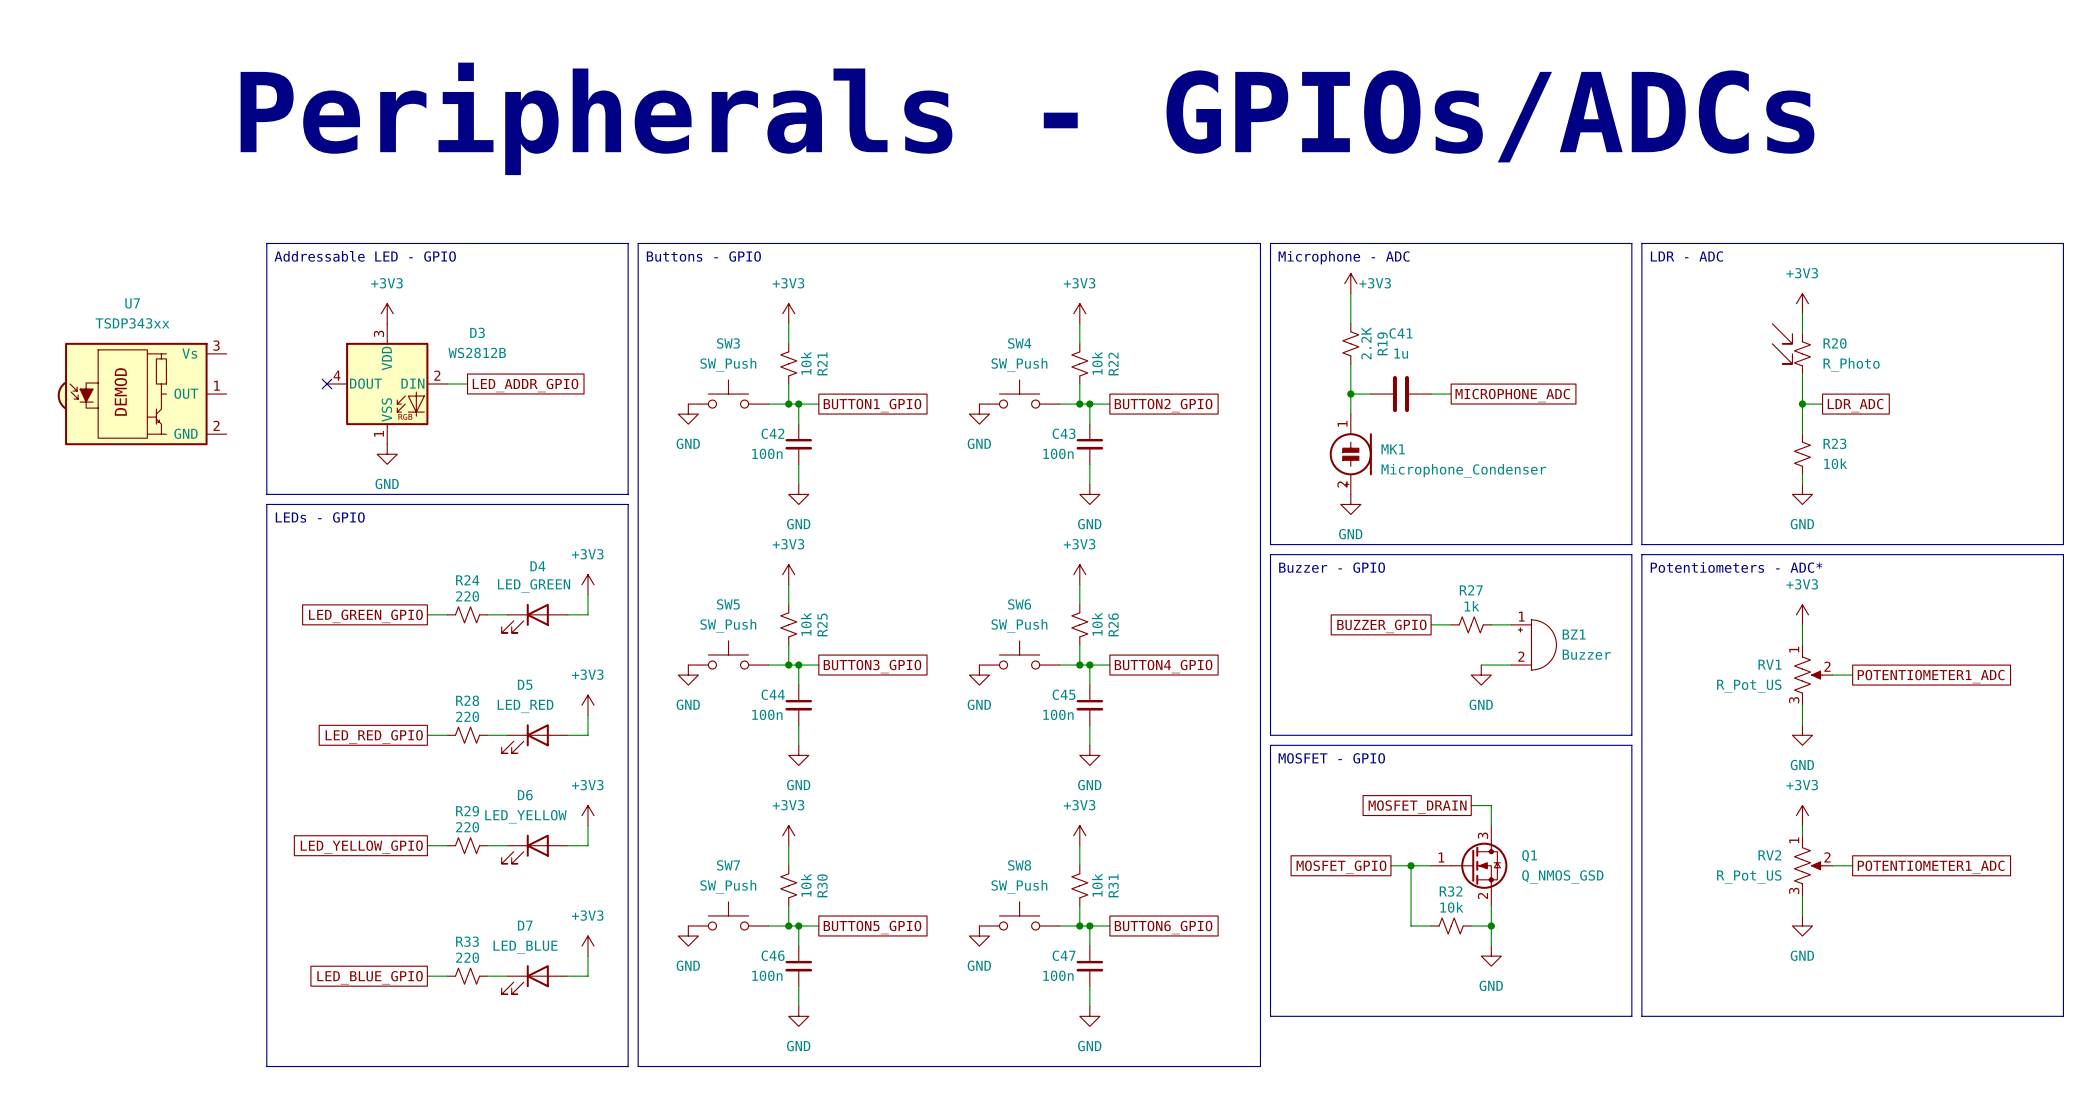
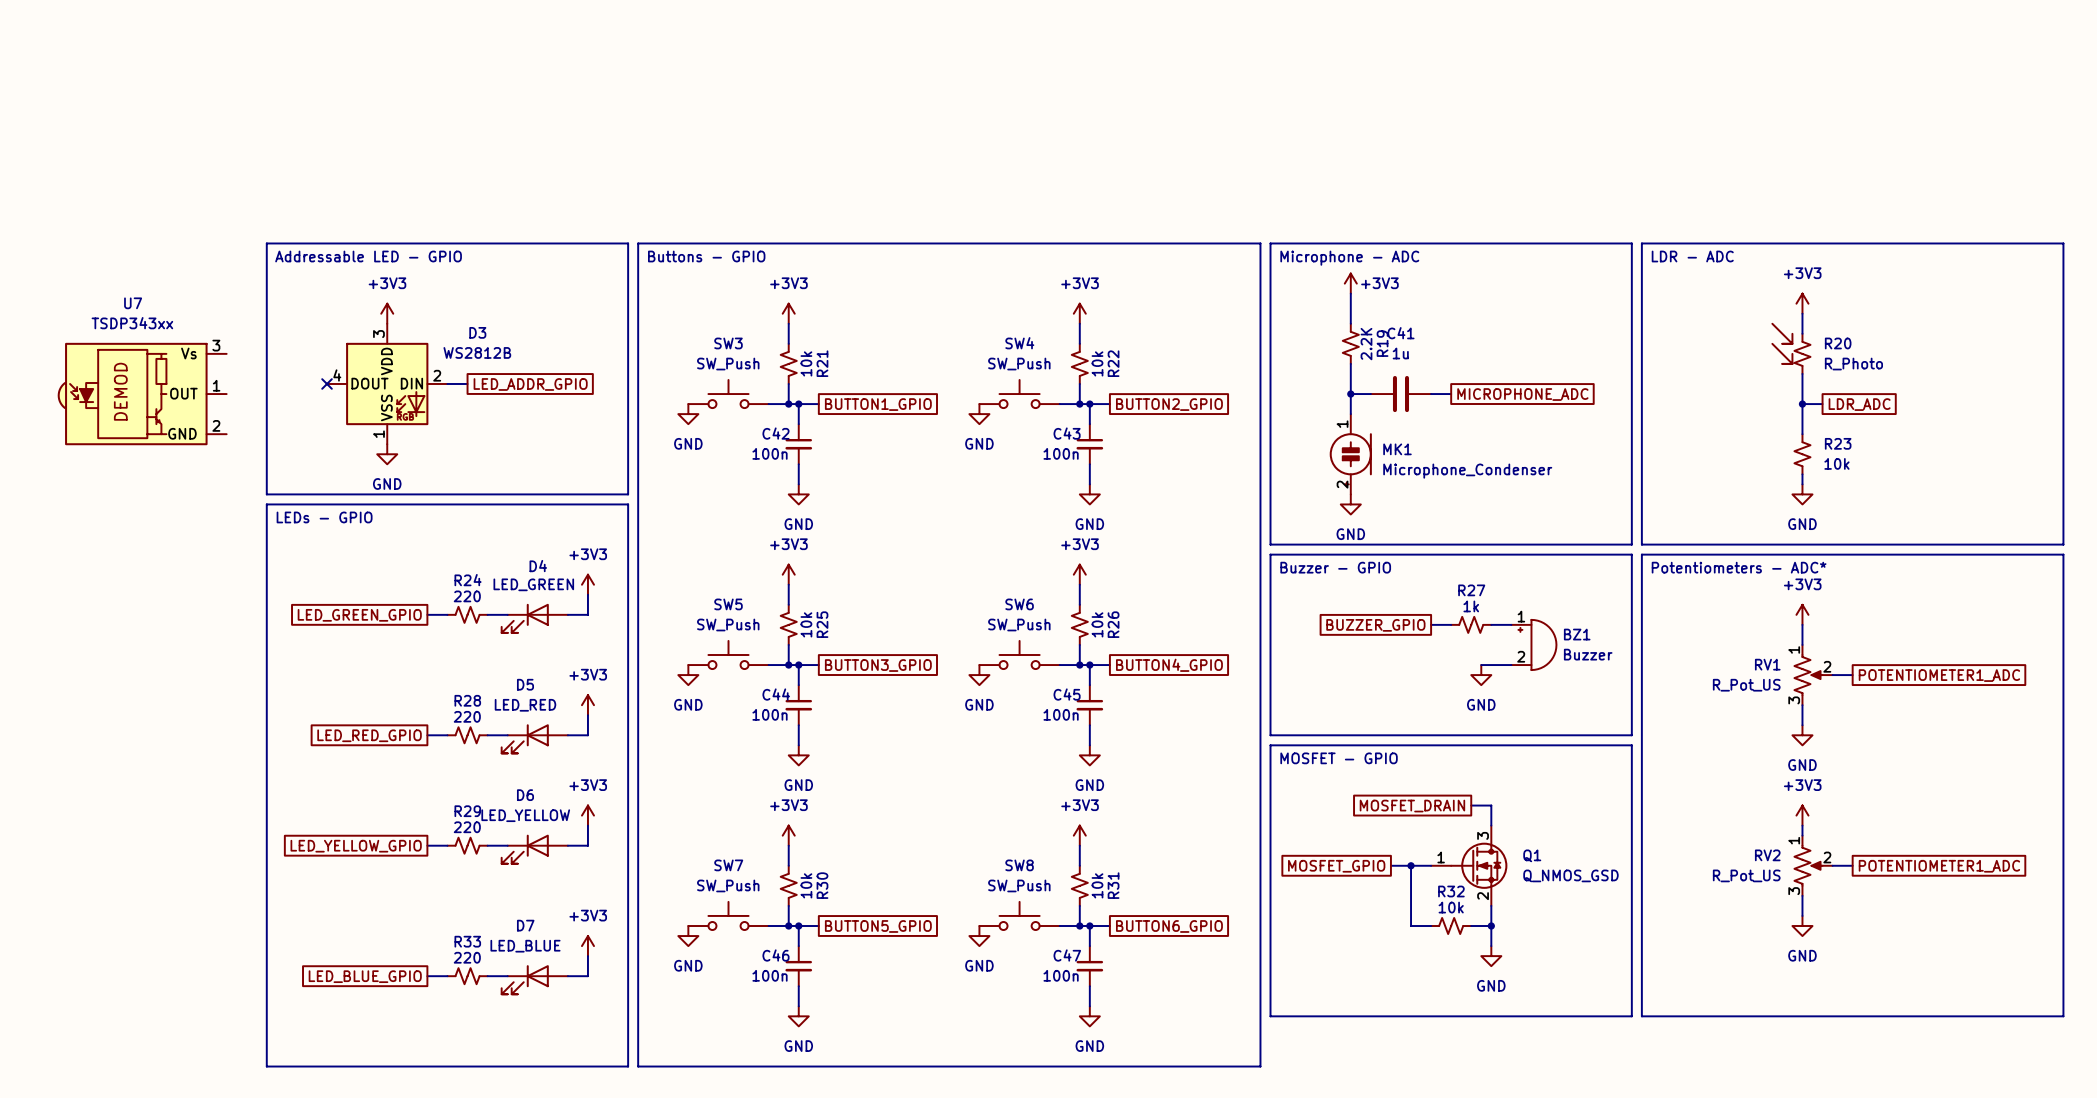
text: Peripherals - GPIOs/ADCs (1027, 118) -> none

